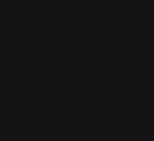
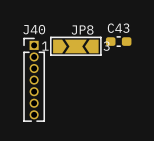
C43: none -> (118, 41)
JP8: none -> (75, 46)
J40: none -> (34, 79)

